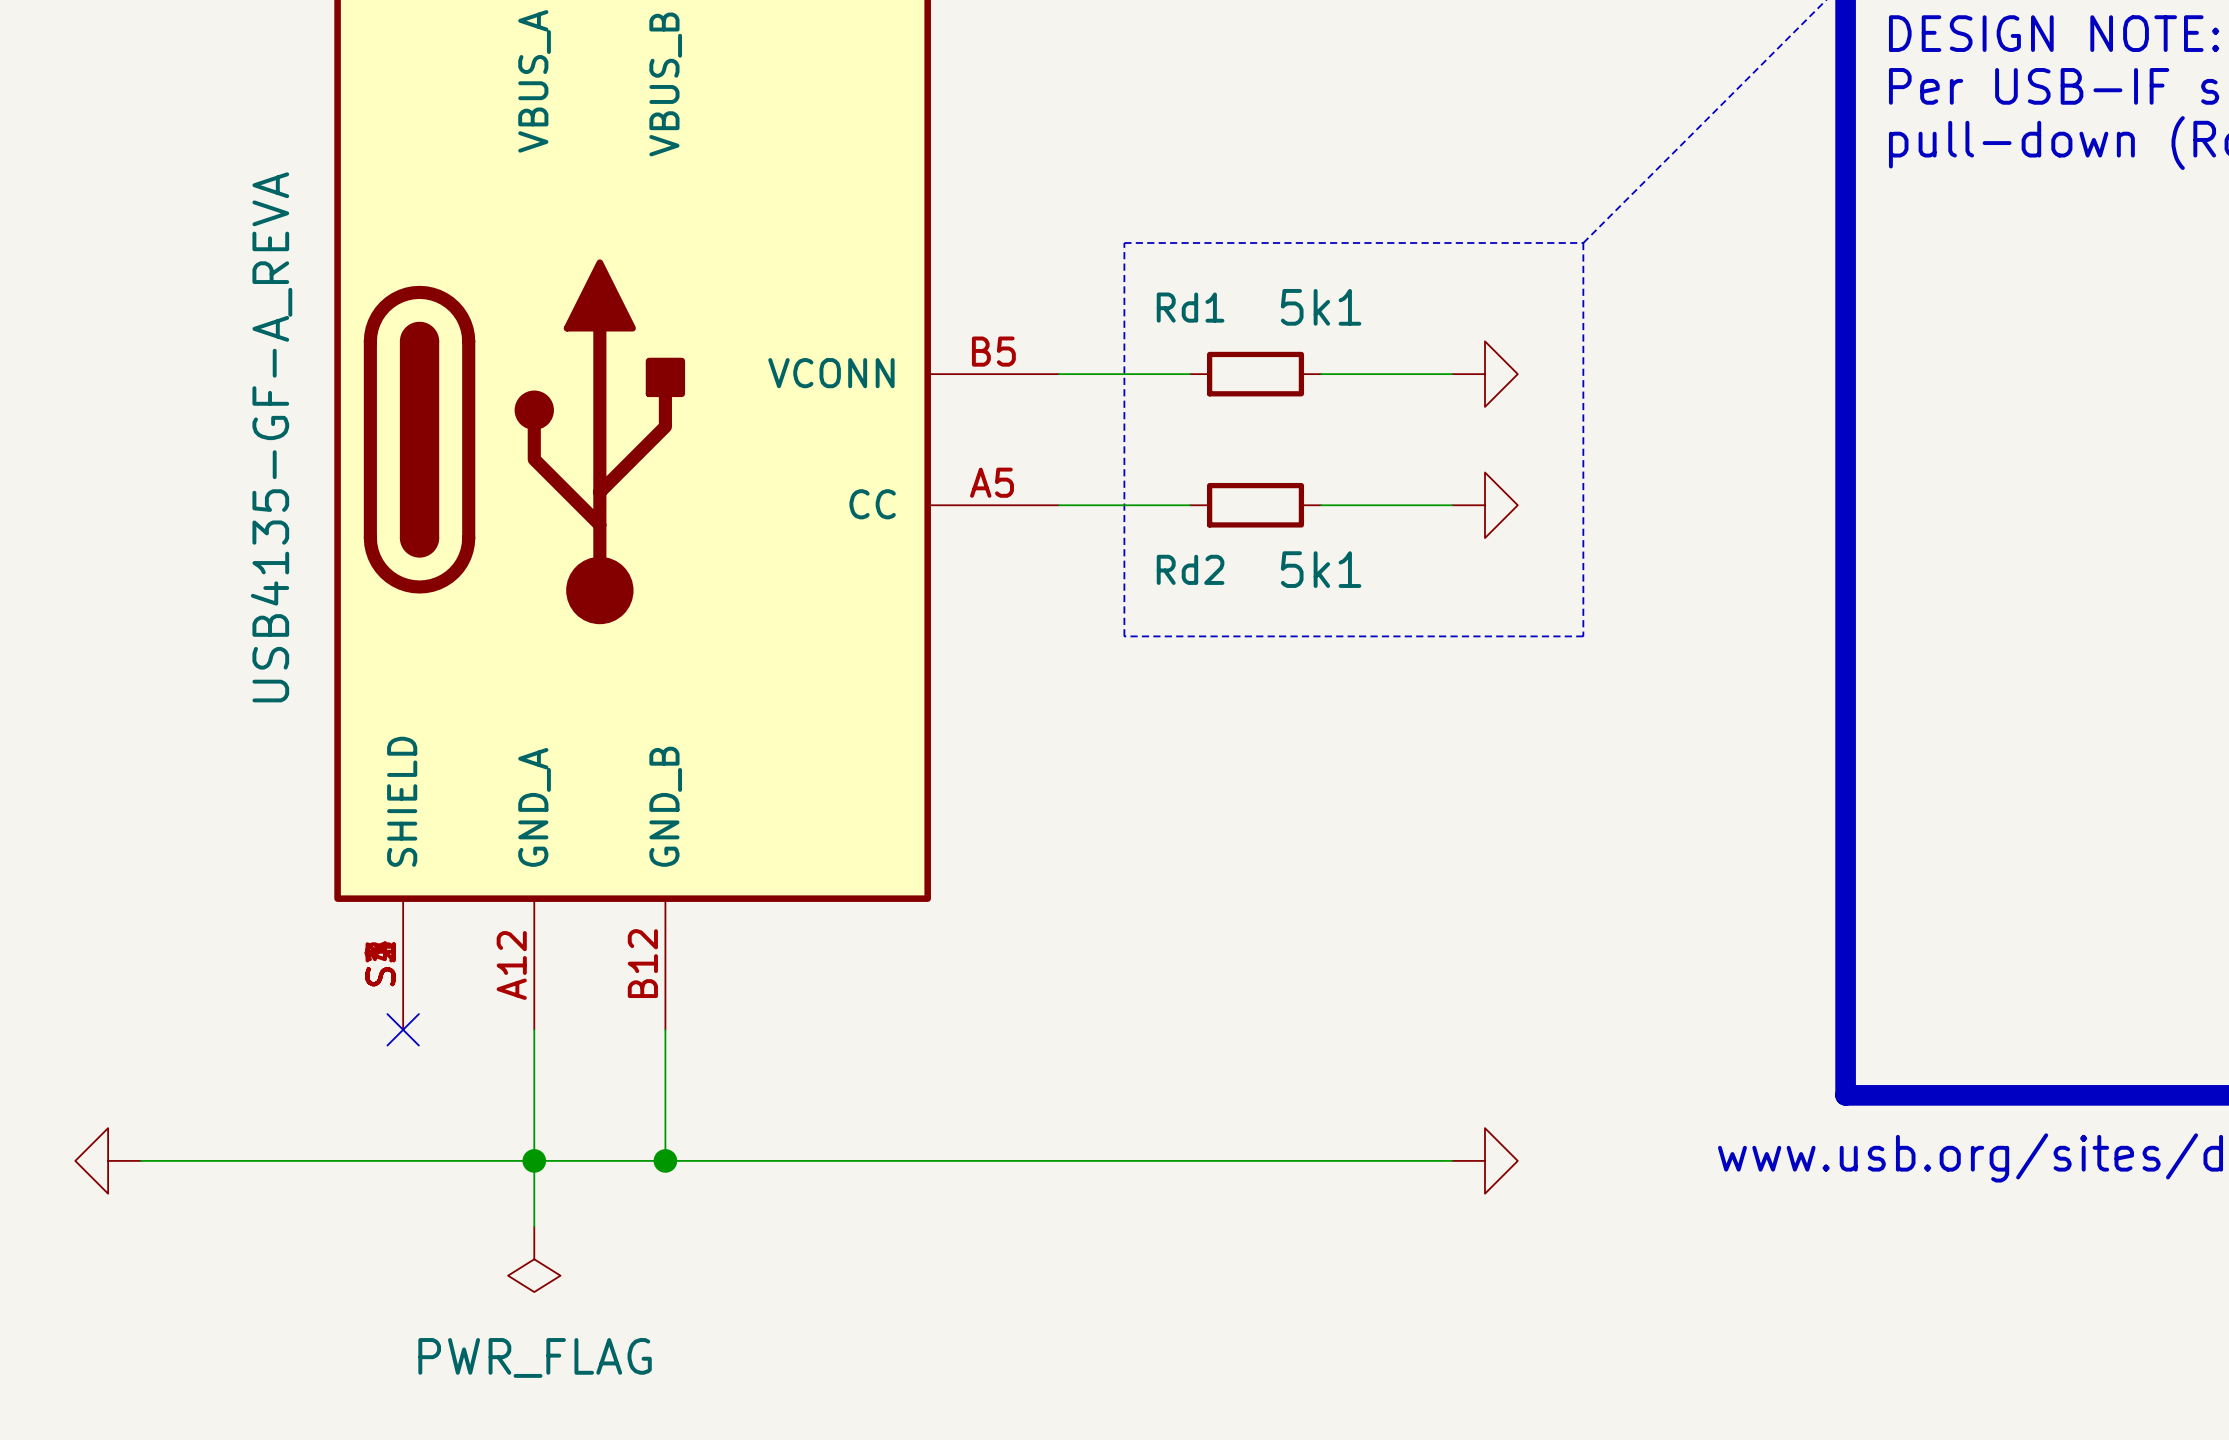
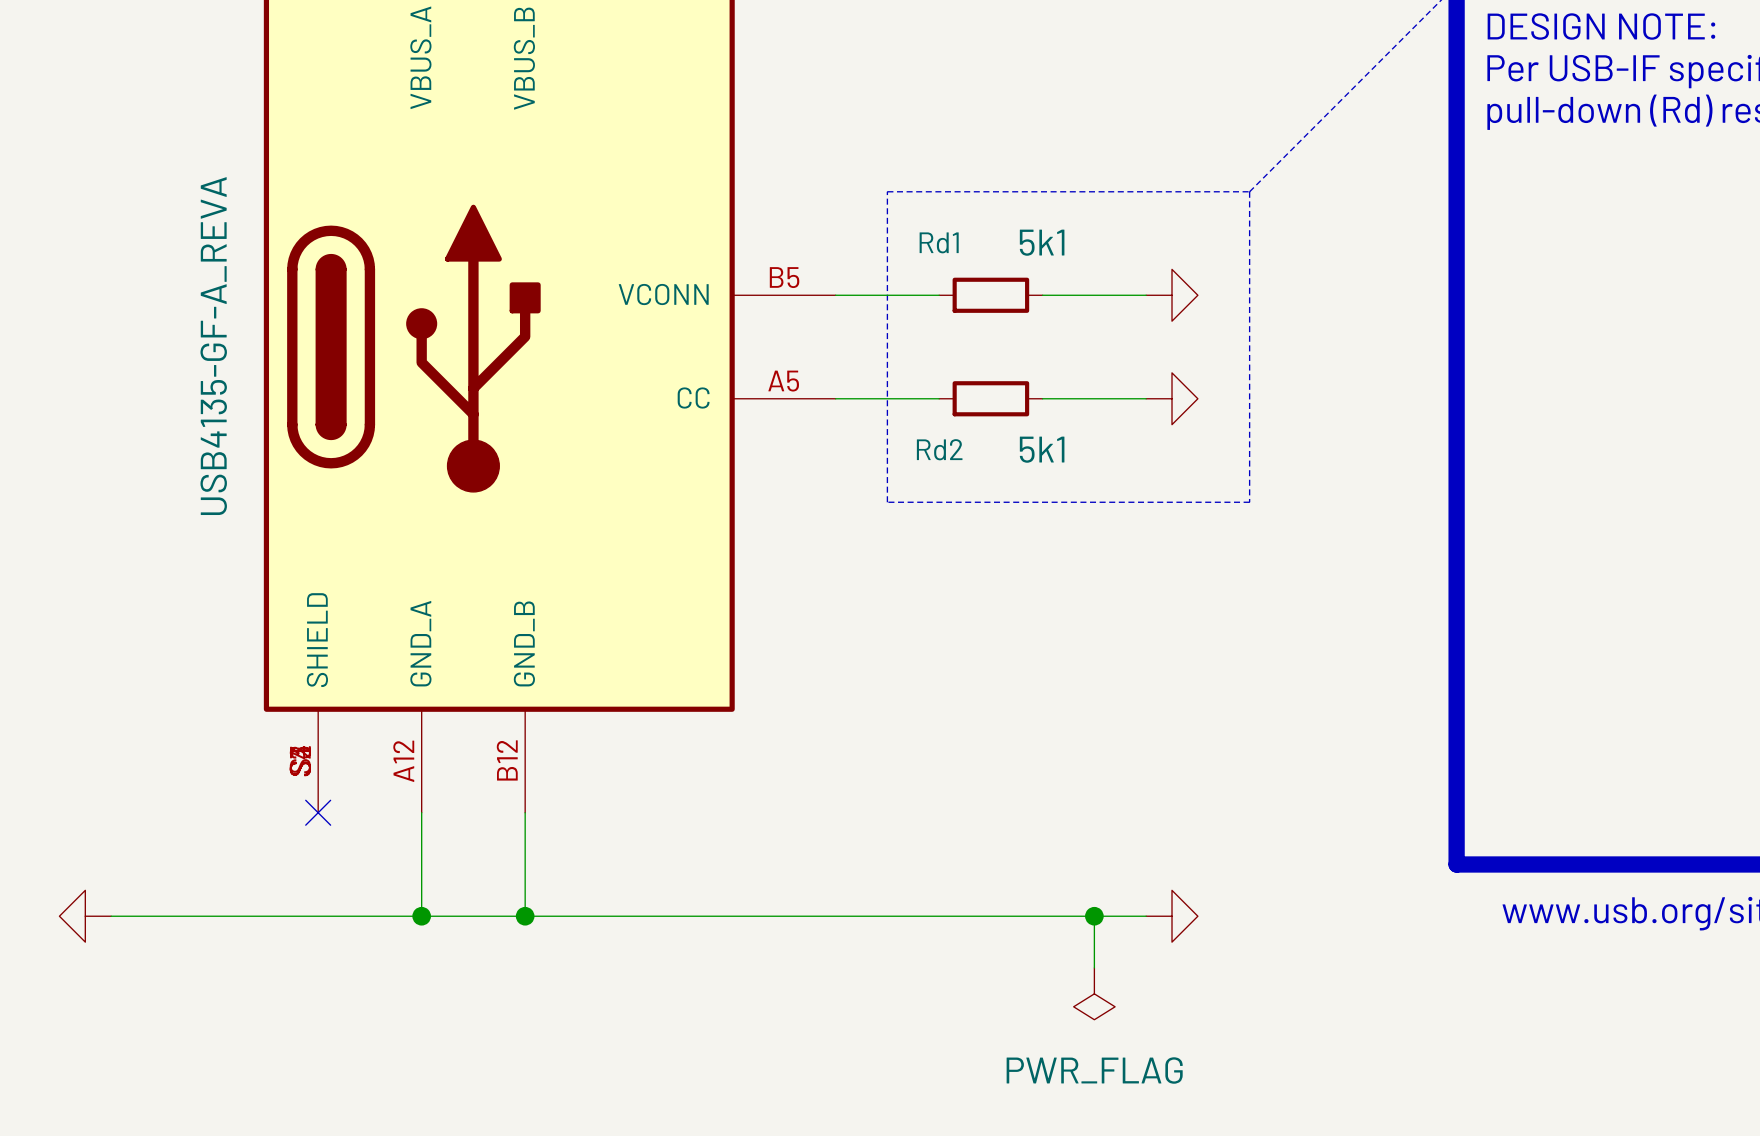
wire: (534, 1160) (534, 1226) -> none
wire: none -> (1094, 916) (1094, 967)
junction: none -> (1094, 916)
power symbol: PWR_FLAG (534, 1259) -> none
power symbol: none -> PWR_FLAG (1094, 993)

